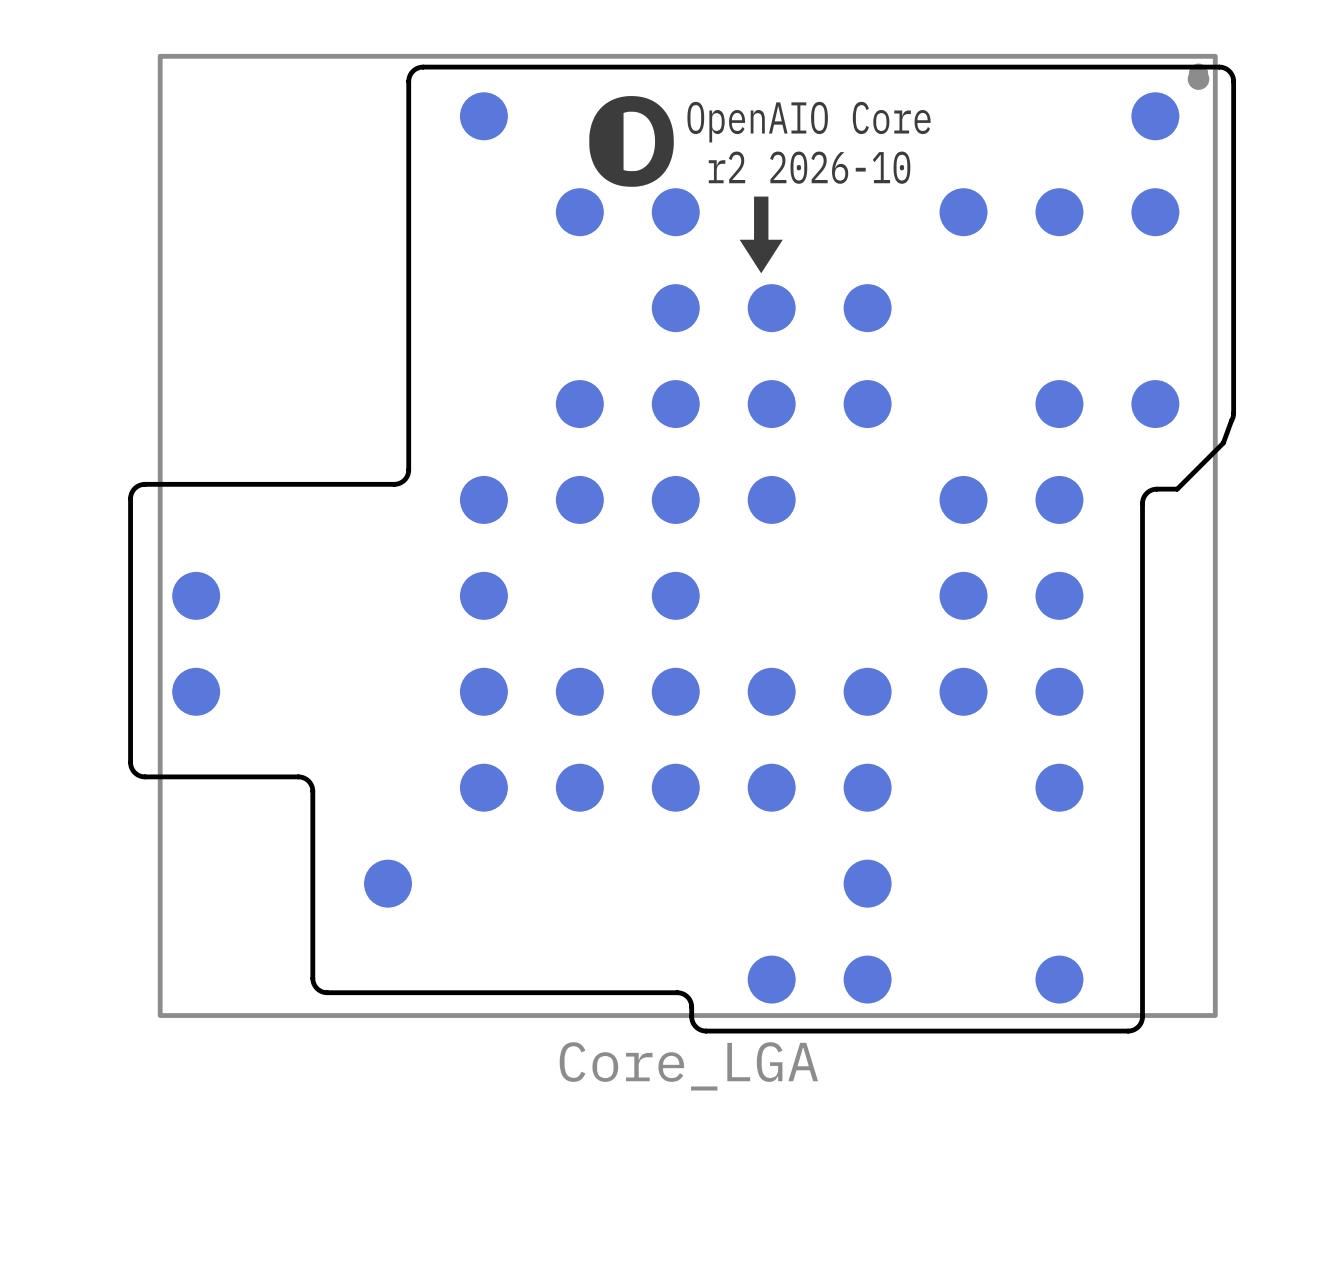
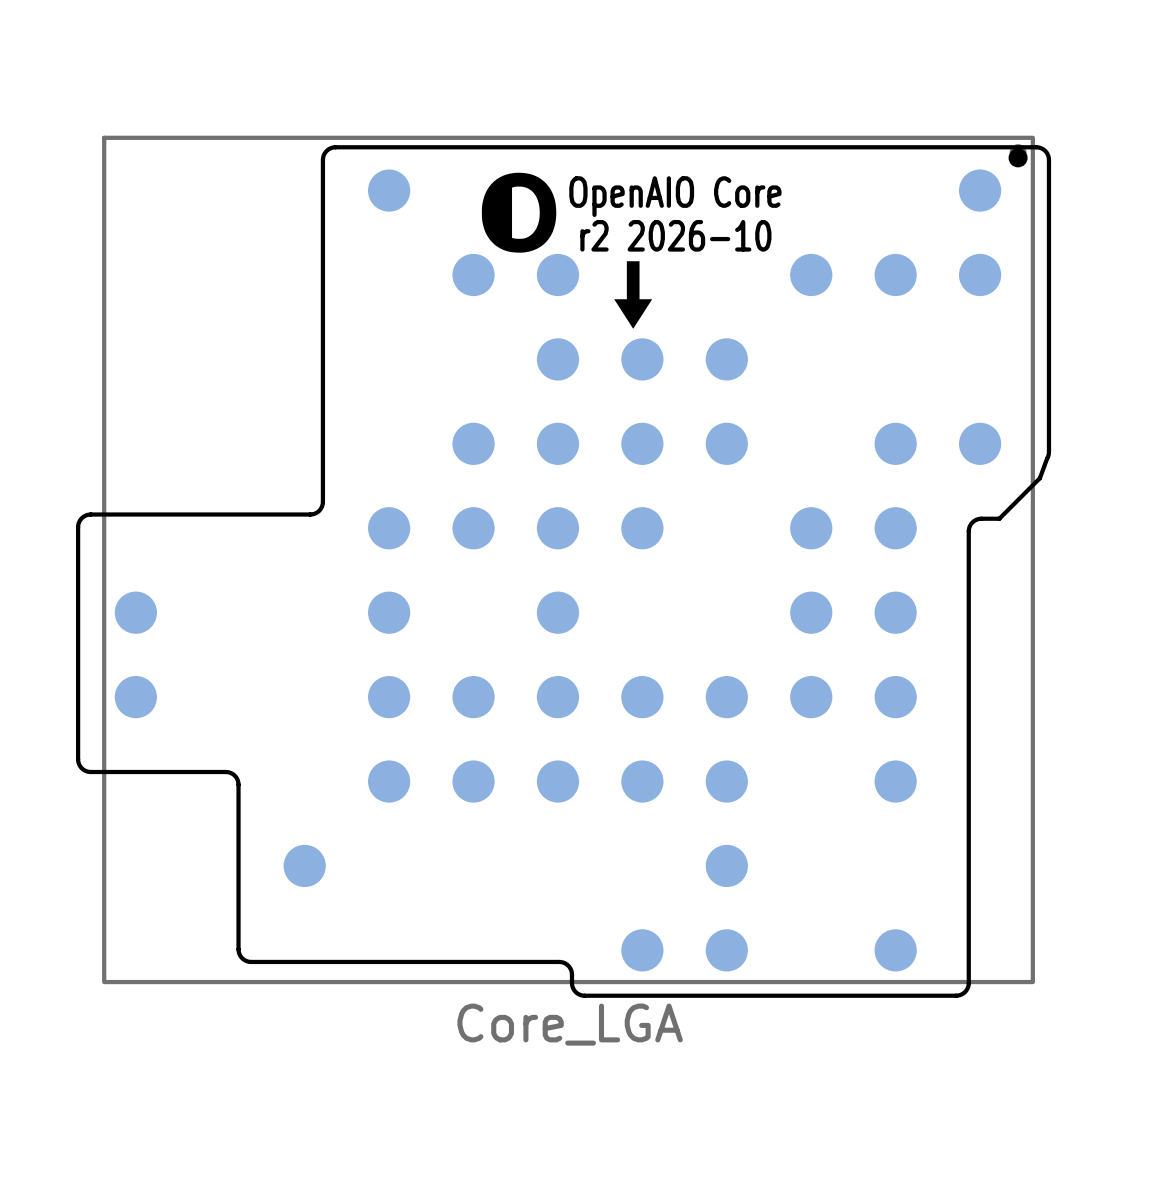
part footprint: [157, 53, 1218, 1018] -> [102, 135, 1035, 985]

